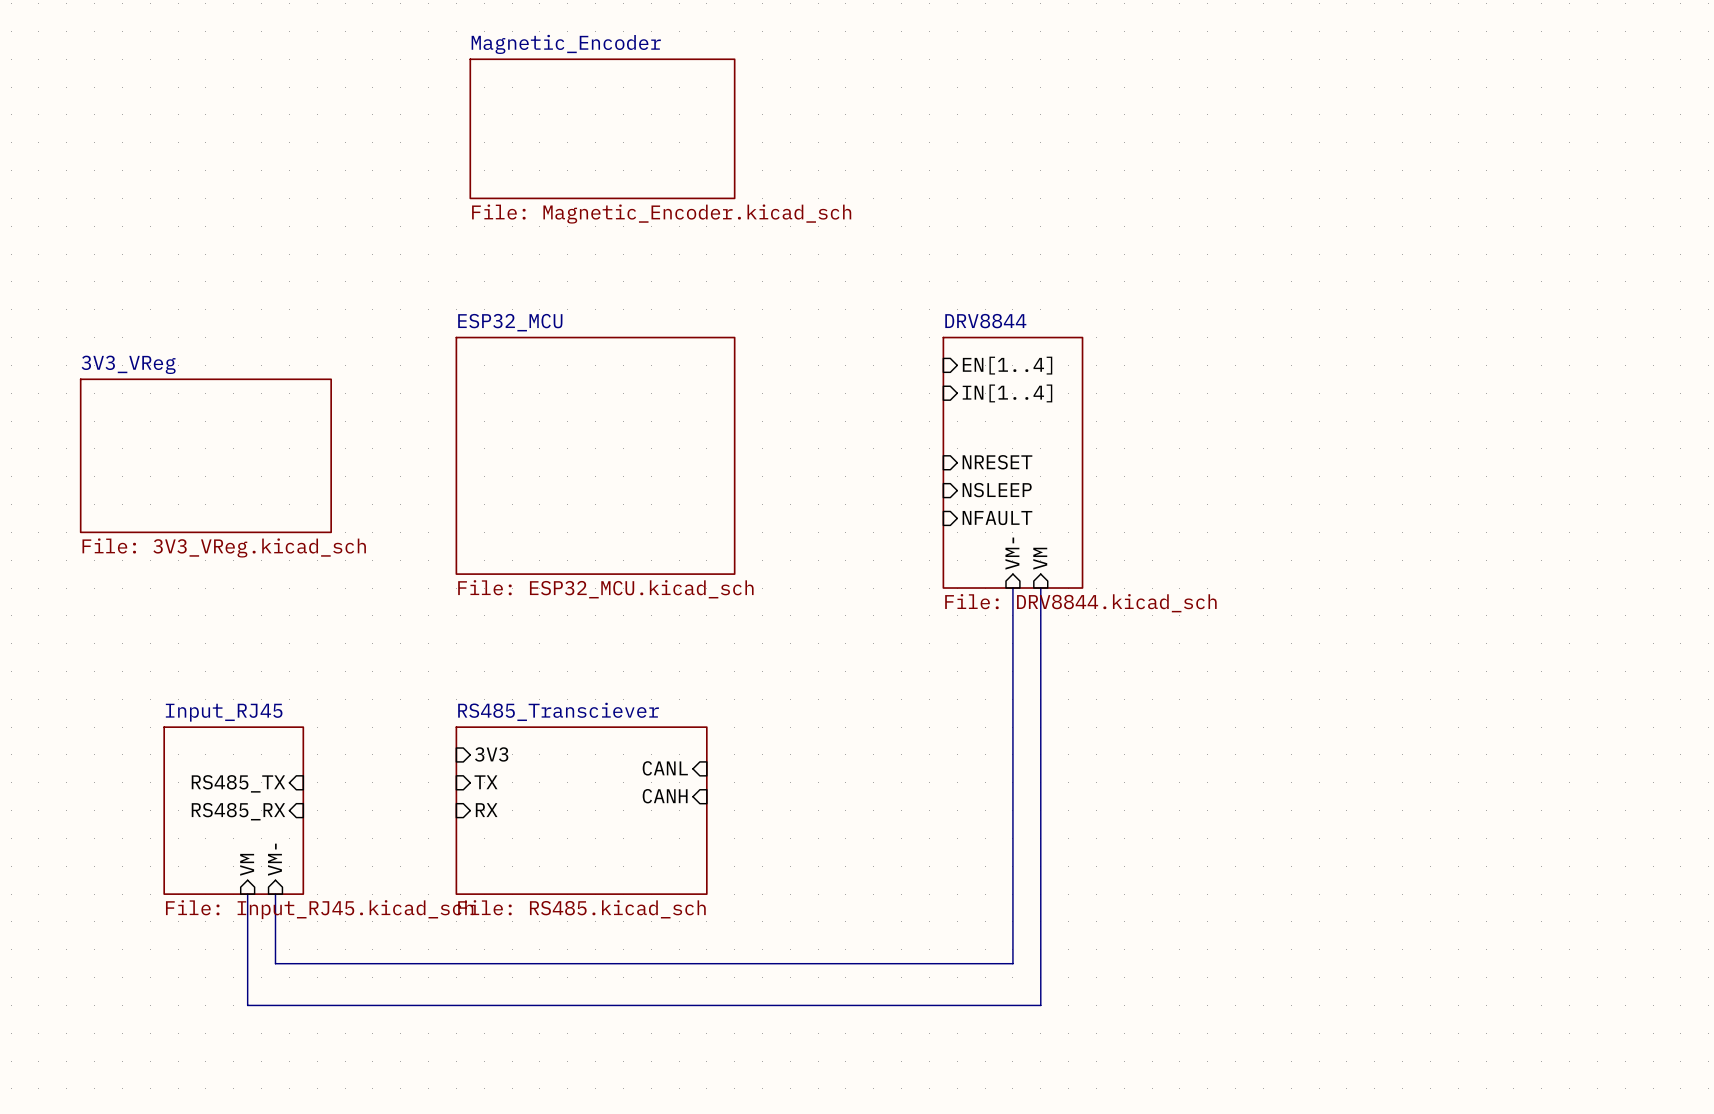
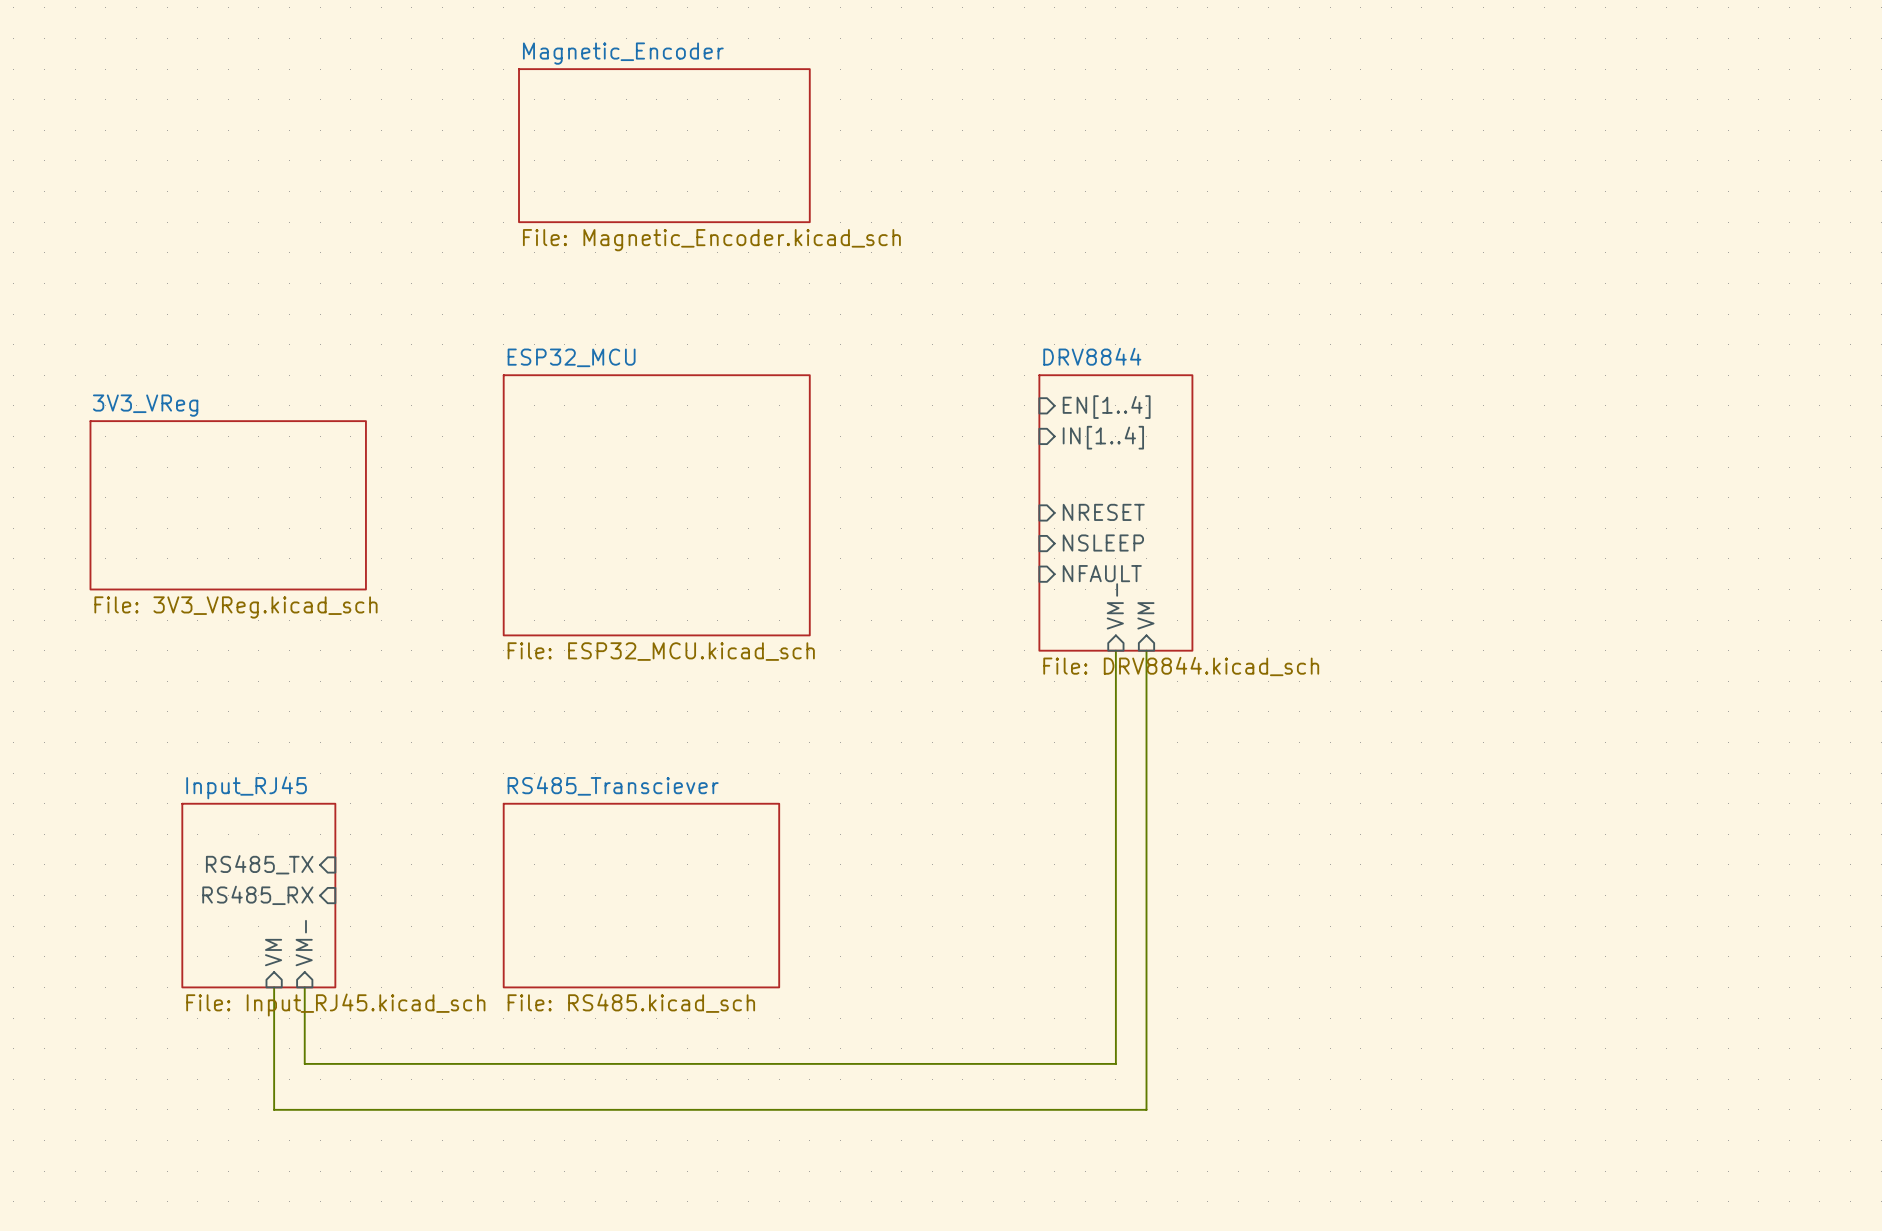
sheet pin: 3V3 (491, 754) -> none
sheet pin: CANL (665, 768) -> none
sheet pin: TX (486, 782) -> none
sheet pin: CANH (665, 796) -> none
sheet pin: RX (486, 810) -> none

